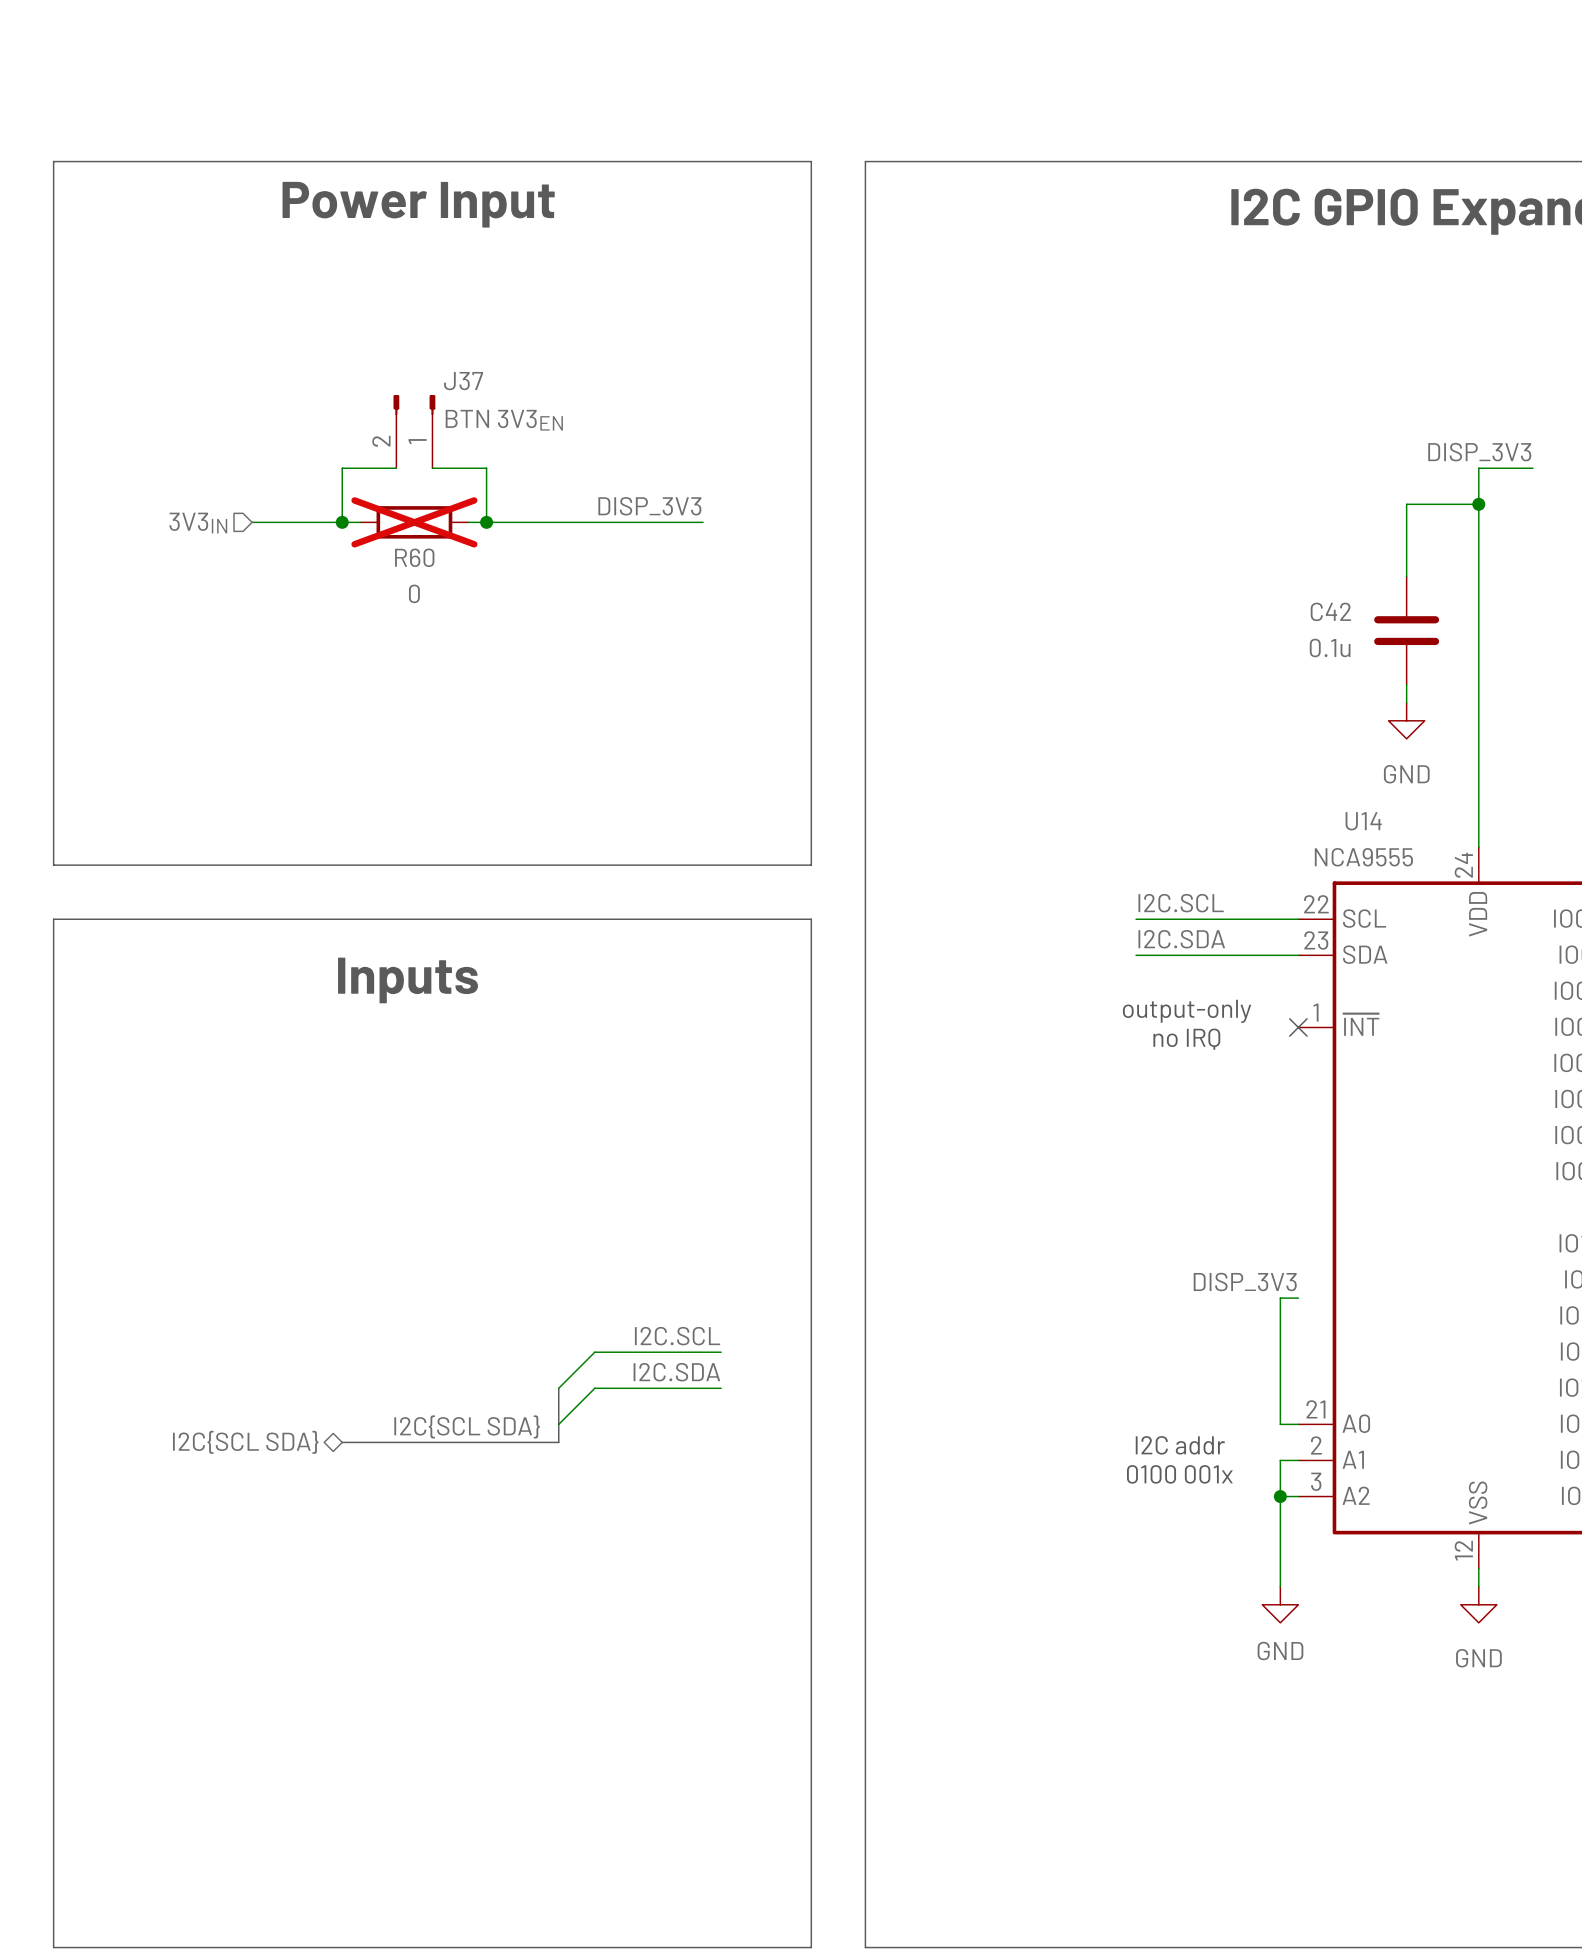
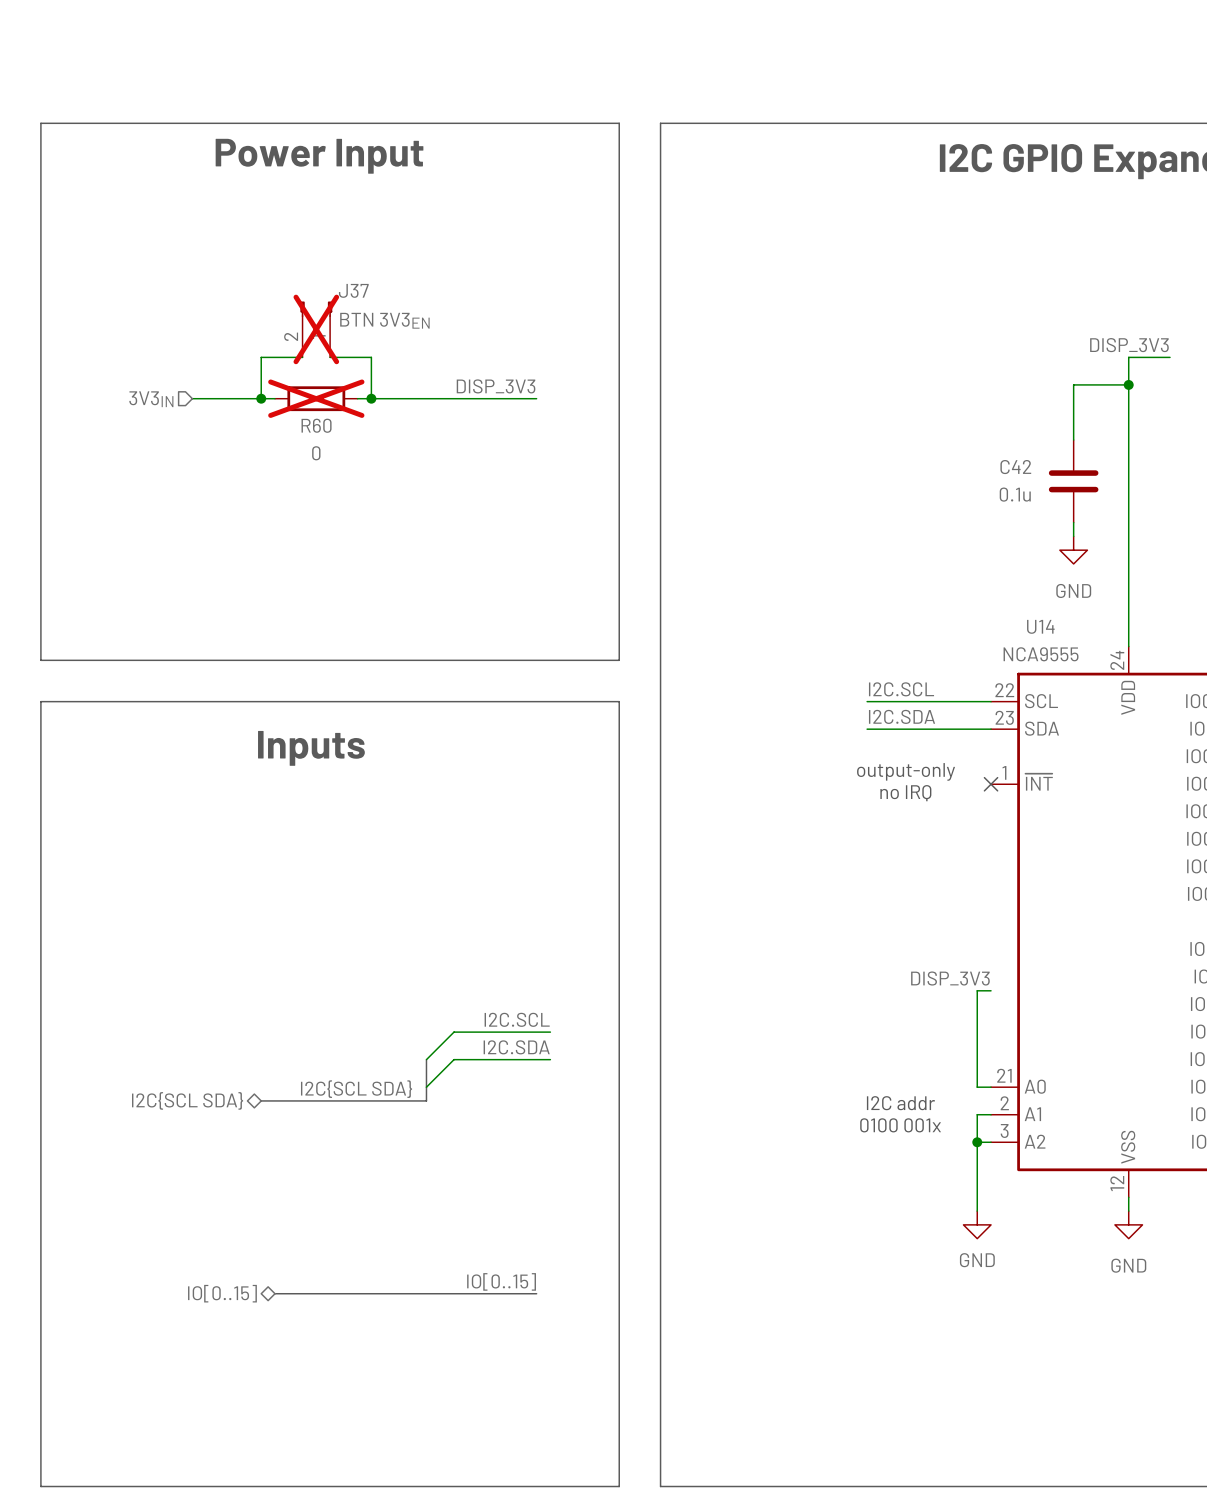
J37 do-not-place cross: none -> (316, 329)
label: none -> IO[0..15] (501, 1281)
hierarchical label: none -> IO[0..15] (222, 1293)
bus: none -> (275, 1293) (536, 1293)

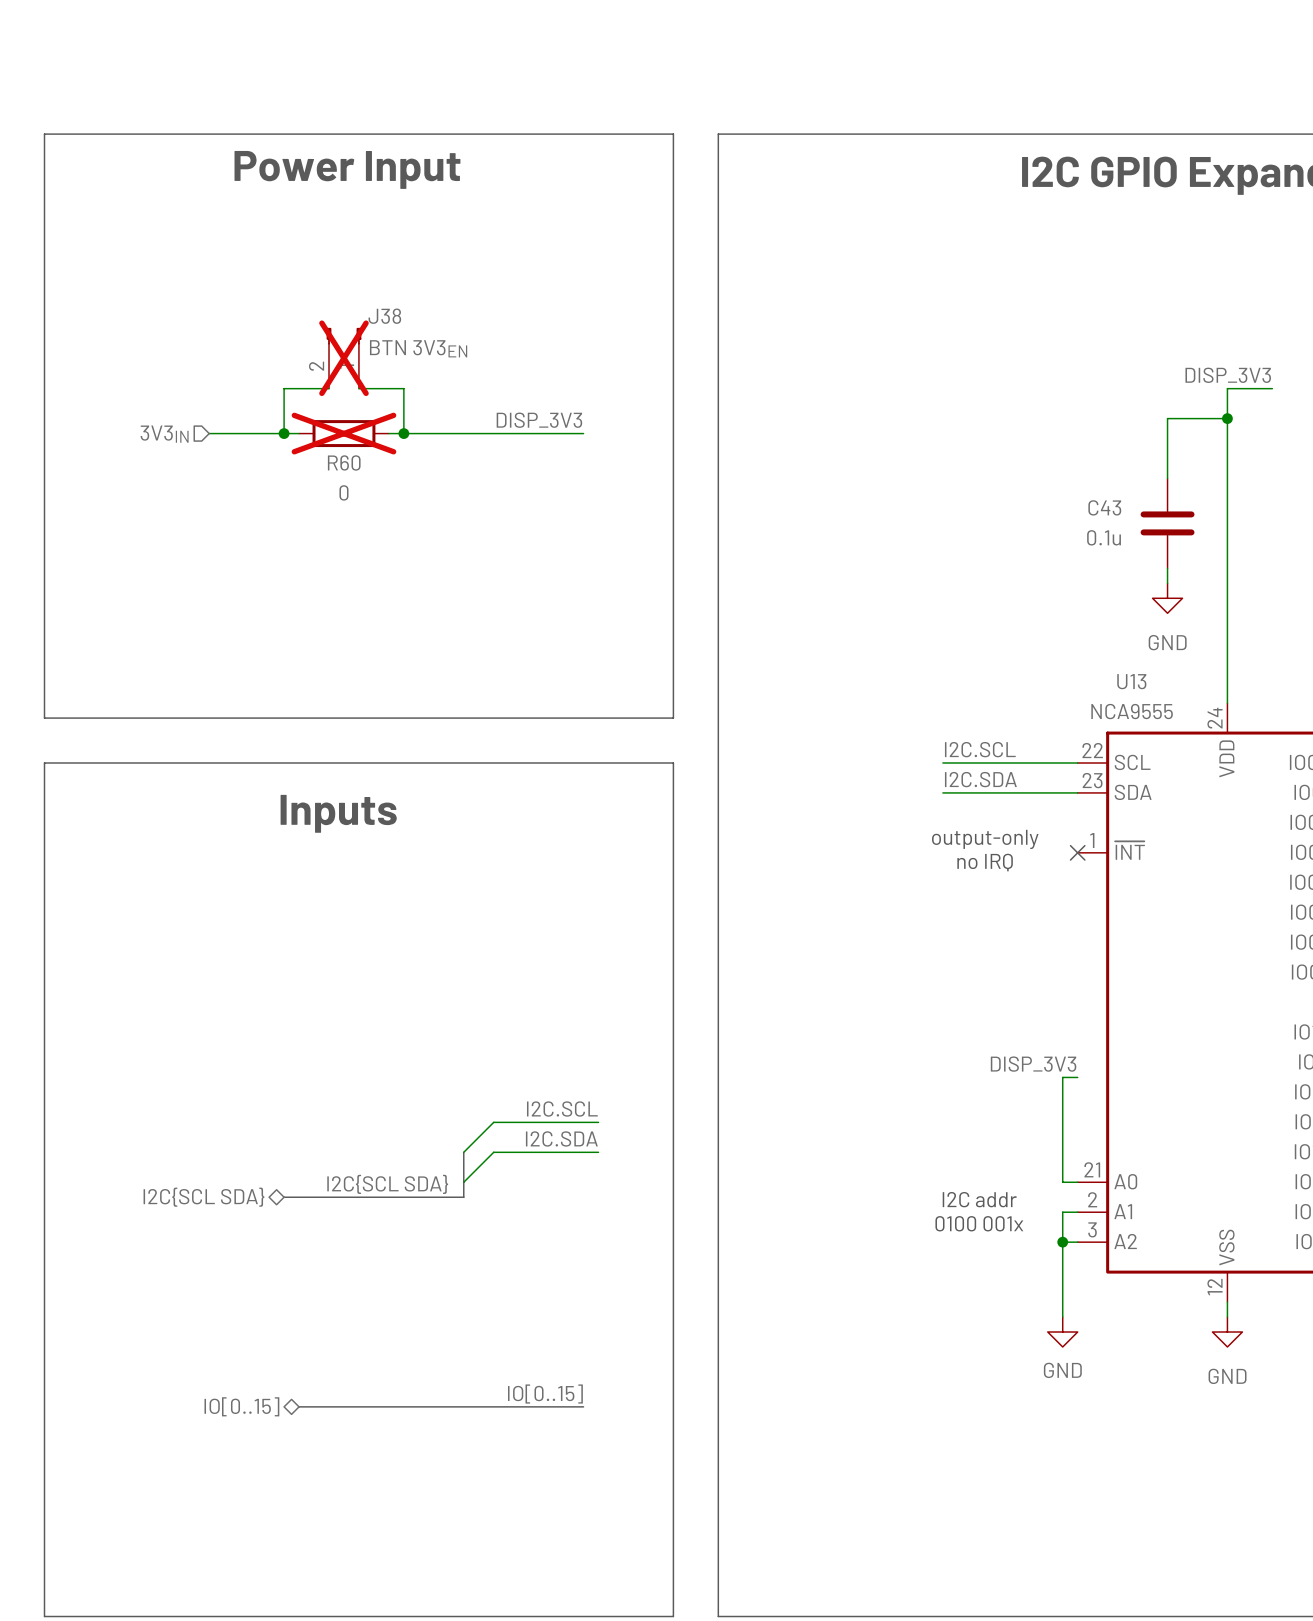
J37 name: J37 (353, 290) -> J38 (384, 316)
C42 name: C42 (1015, 467) -> C43 (1104, 507)
U14 name: U14 (1040, 626) -> U13 (1131, 681)

